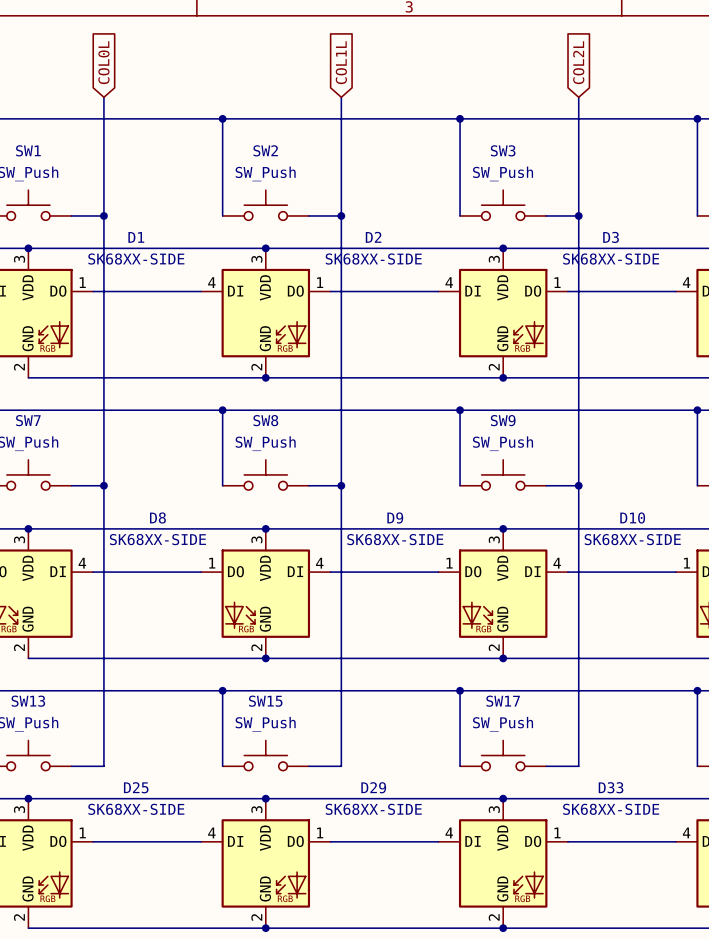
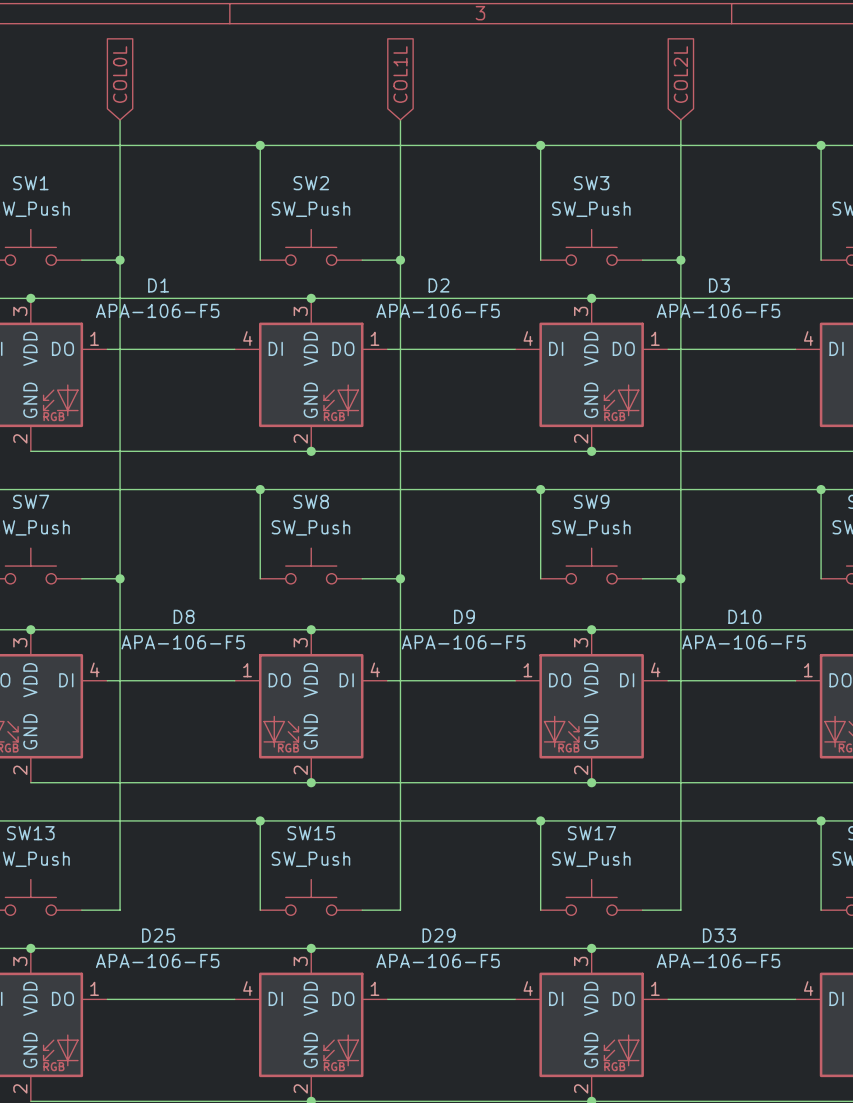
D1 value: SK68XX-SIDE (136, 259) -> APA-106-F5 (157, 310)
D2 value: SK68XX-SIDE (373, 259) -> APA-106-F5 (438, 310)
D3 value: SK68XX-SIDE (611, 259) -> APA-106-F5 (718, 310)
D8 value: SK68XX-SIDE (157, 539) -> APA-106-F5 (183, 642)
D9 value: SK68XX-SIDE (395, 539) -> APA-106-F5 (463, 642)
D10 value: SK68XX-SIDE (632, 539) -> APA-106-F5 (743, 642)
D25 value: SK68XX-SIDE (136, 809) -> APA-106-F5 (157, 960)
D29 value: SK68XX-SIDE (373, 809) -> APA-106-F5 (438, 960)
D33 value: SK68XX-SIDE (611, 809) -> APA-106-F5 (718, 960)

